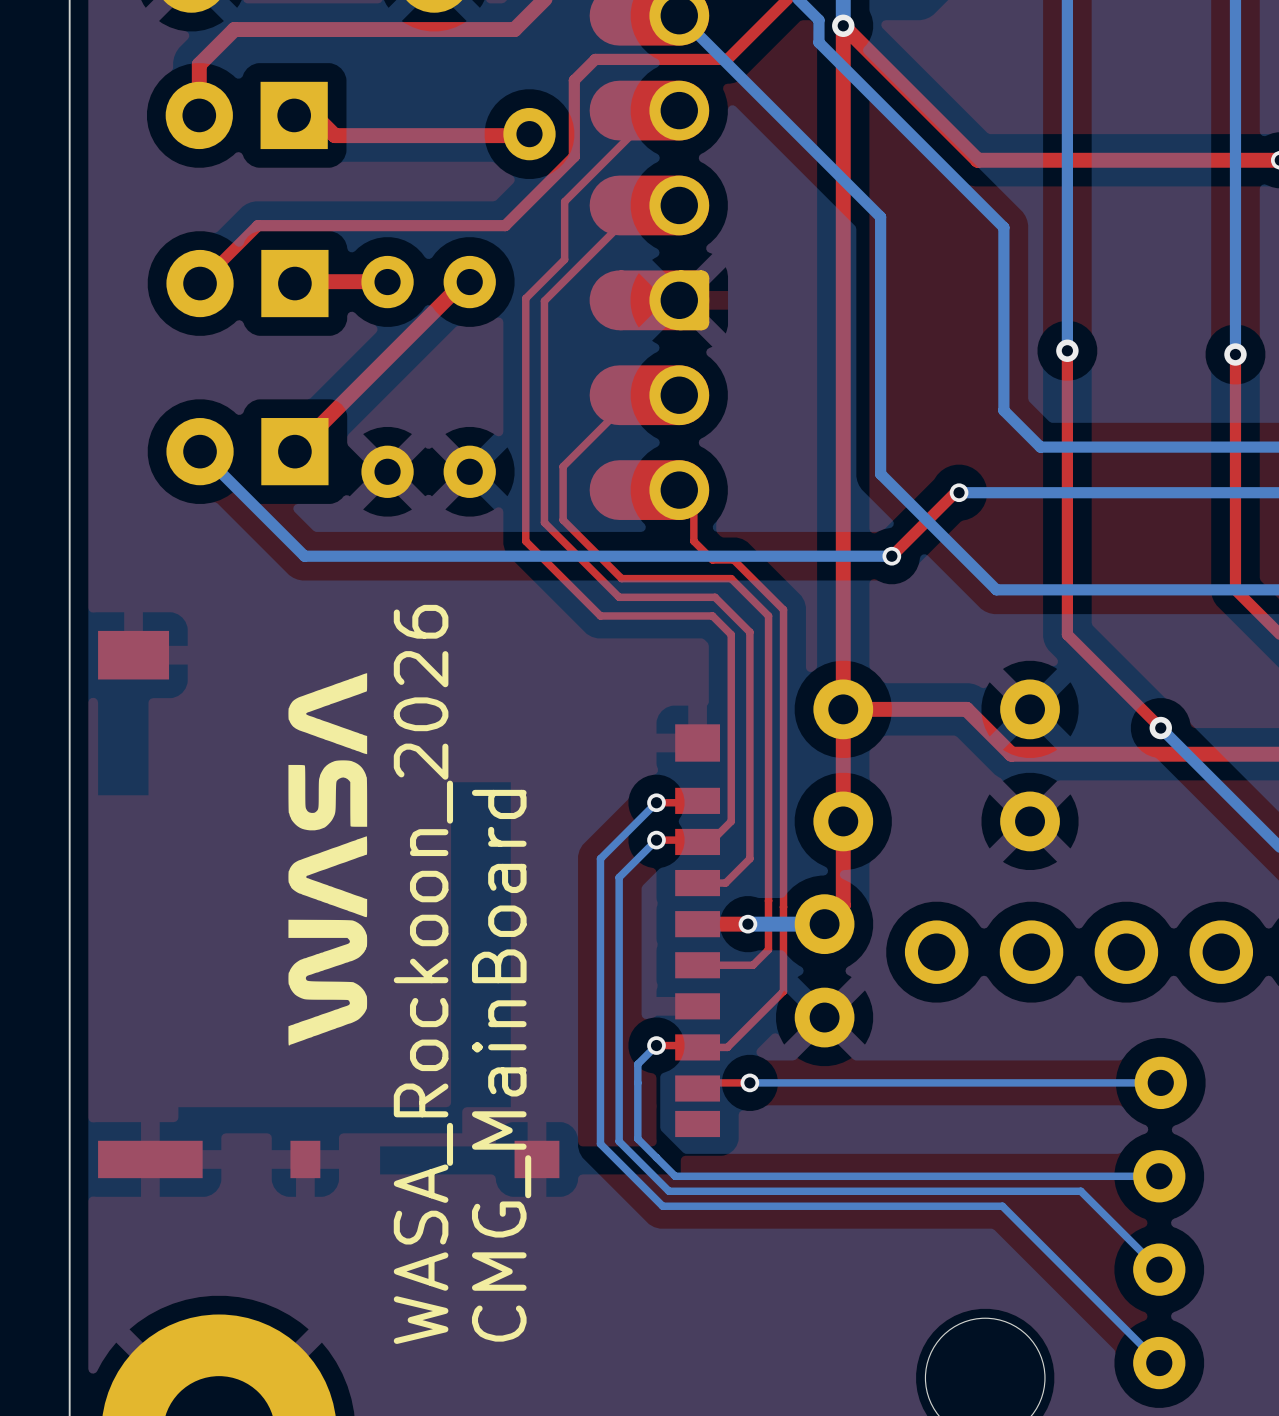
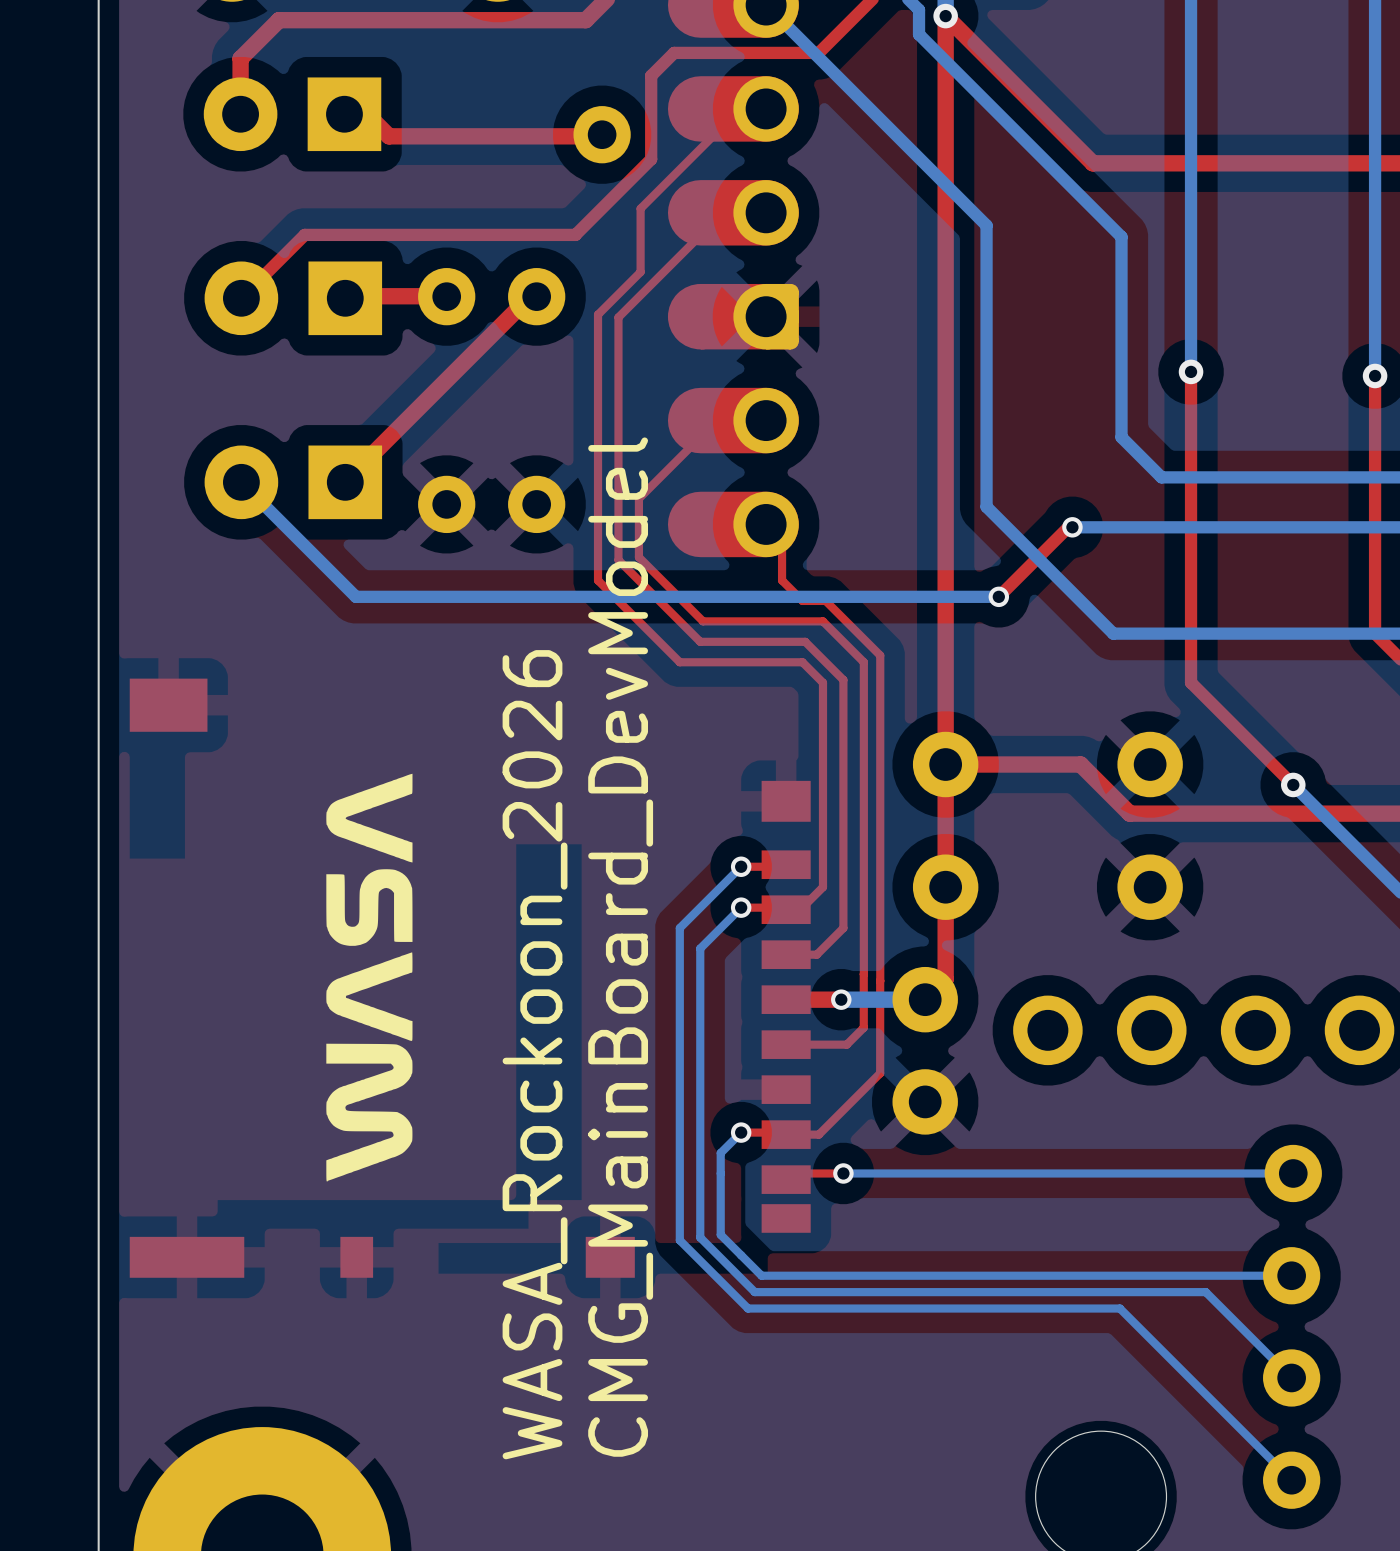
drawing position: (327, 859) -> (369, 977)
text position: WASA_Rockoon_2026 (423, 974) -> WASA_Rockoon_2026 (535, 1054)
text: CMG_MainBoard (501, 1065) -> CMG_MainBoard_DevModel (620, 947)

